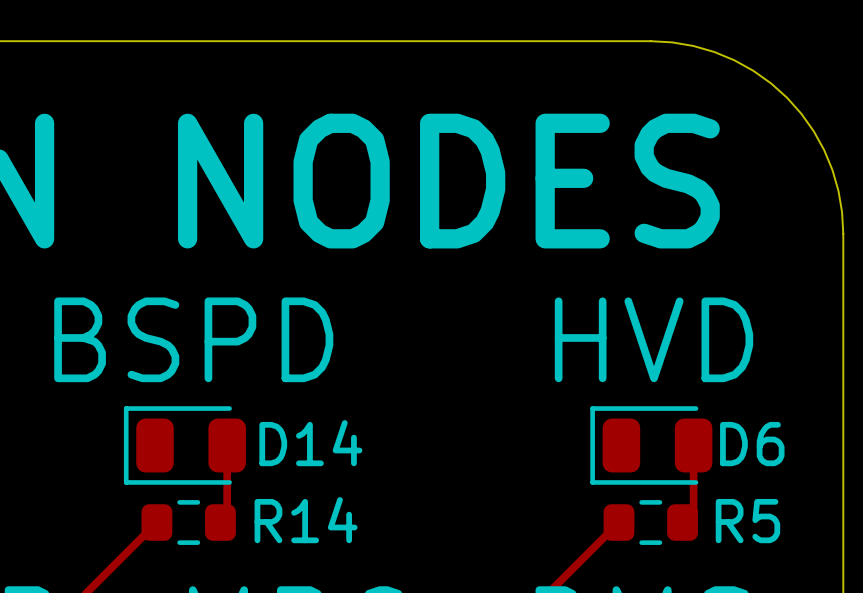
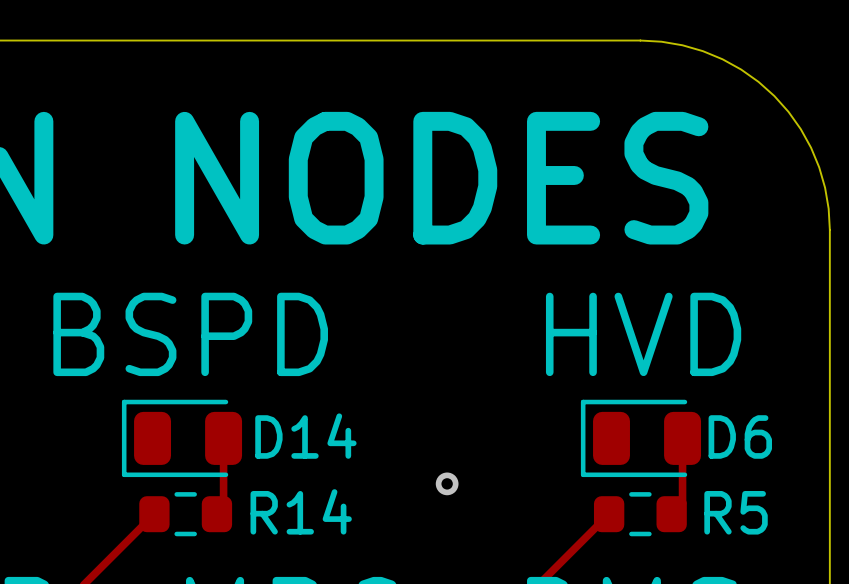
via: none -> (447, 483)

